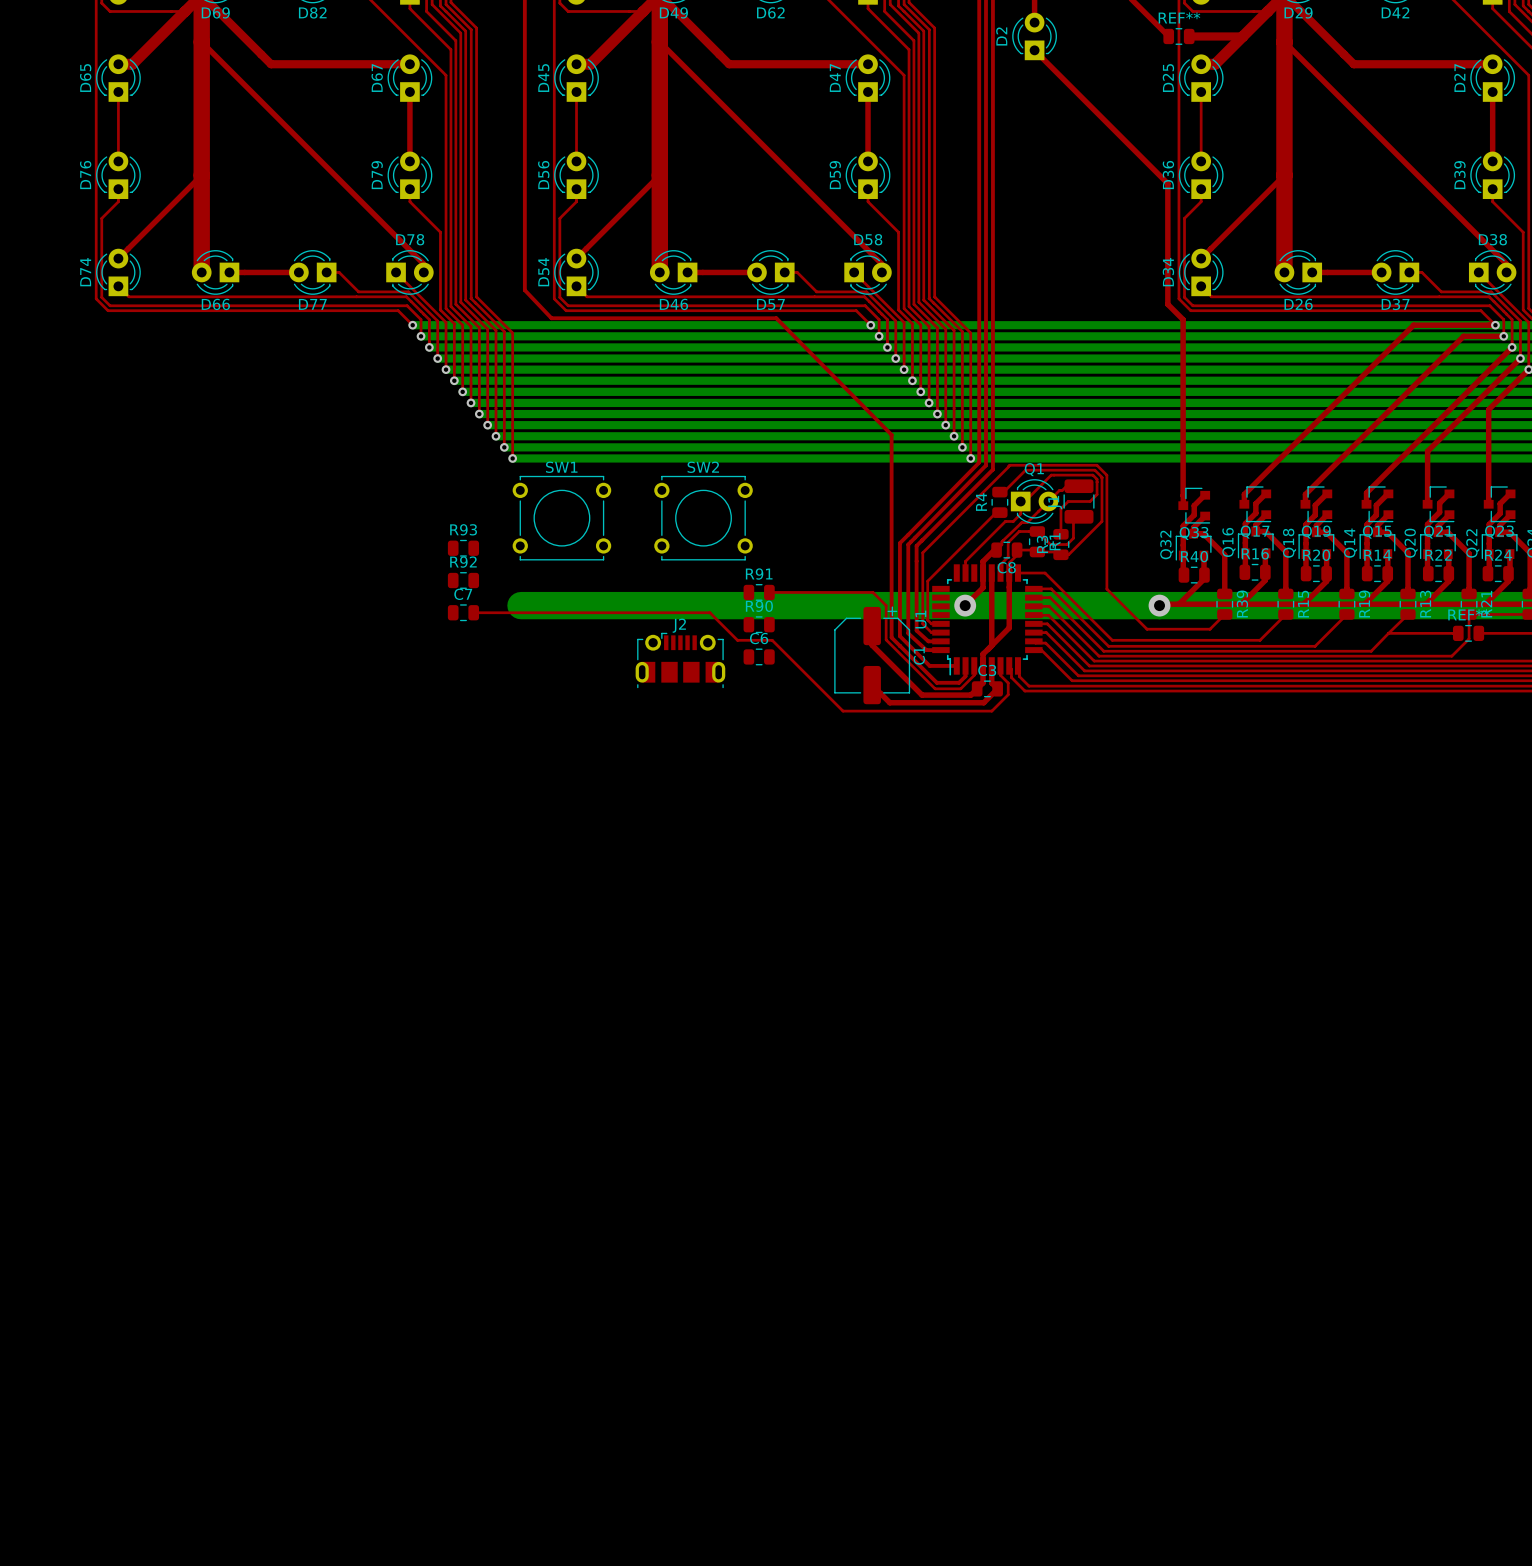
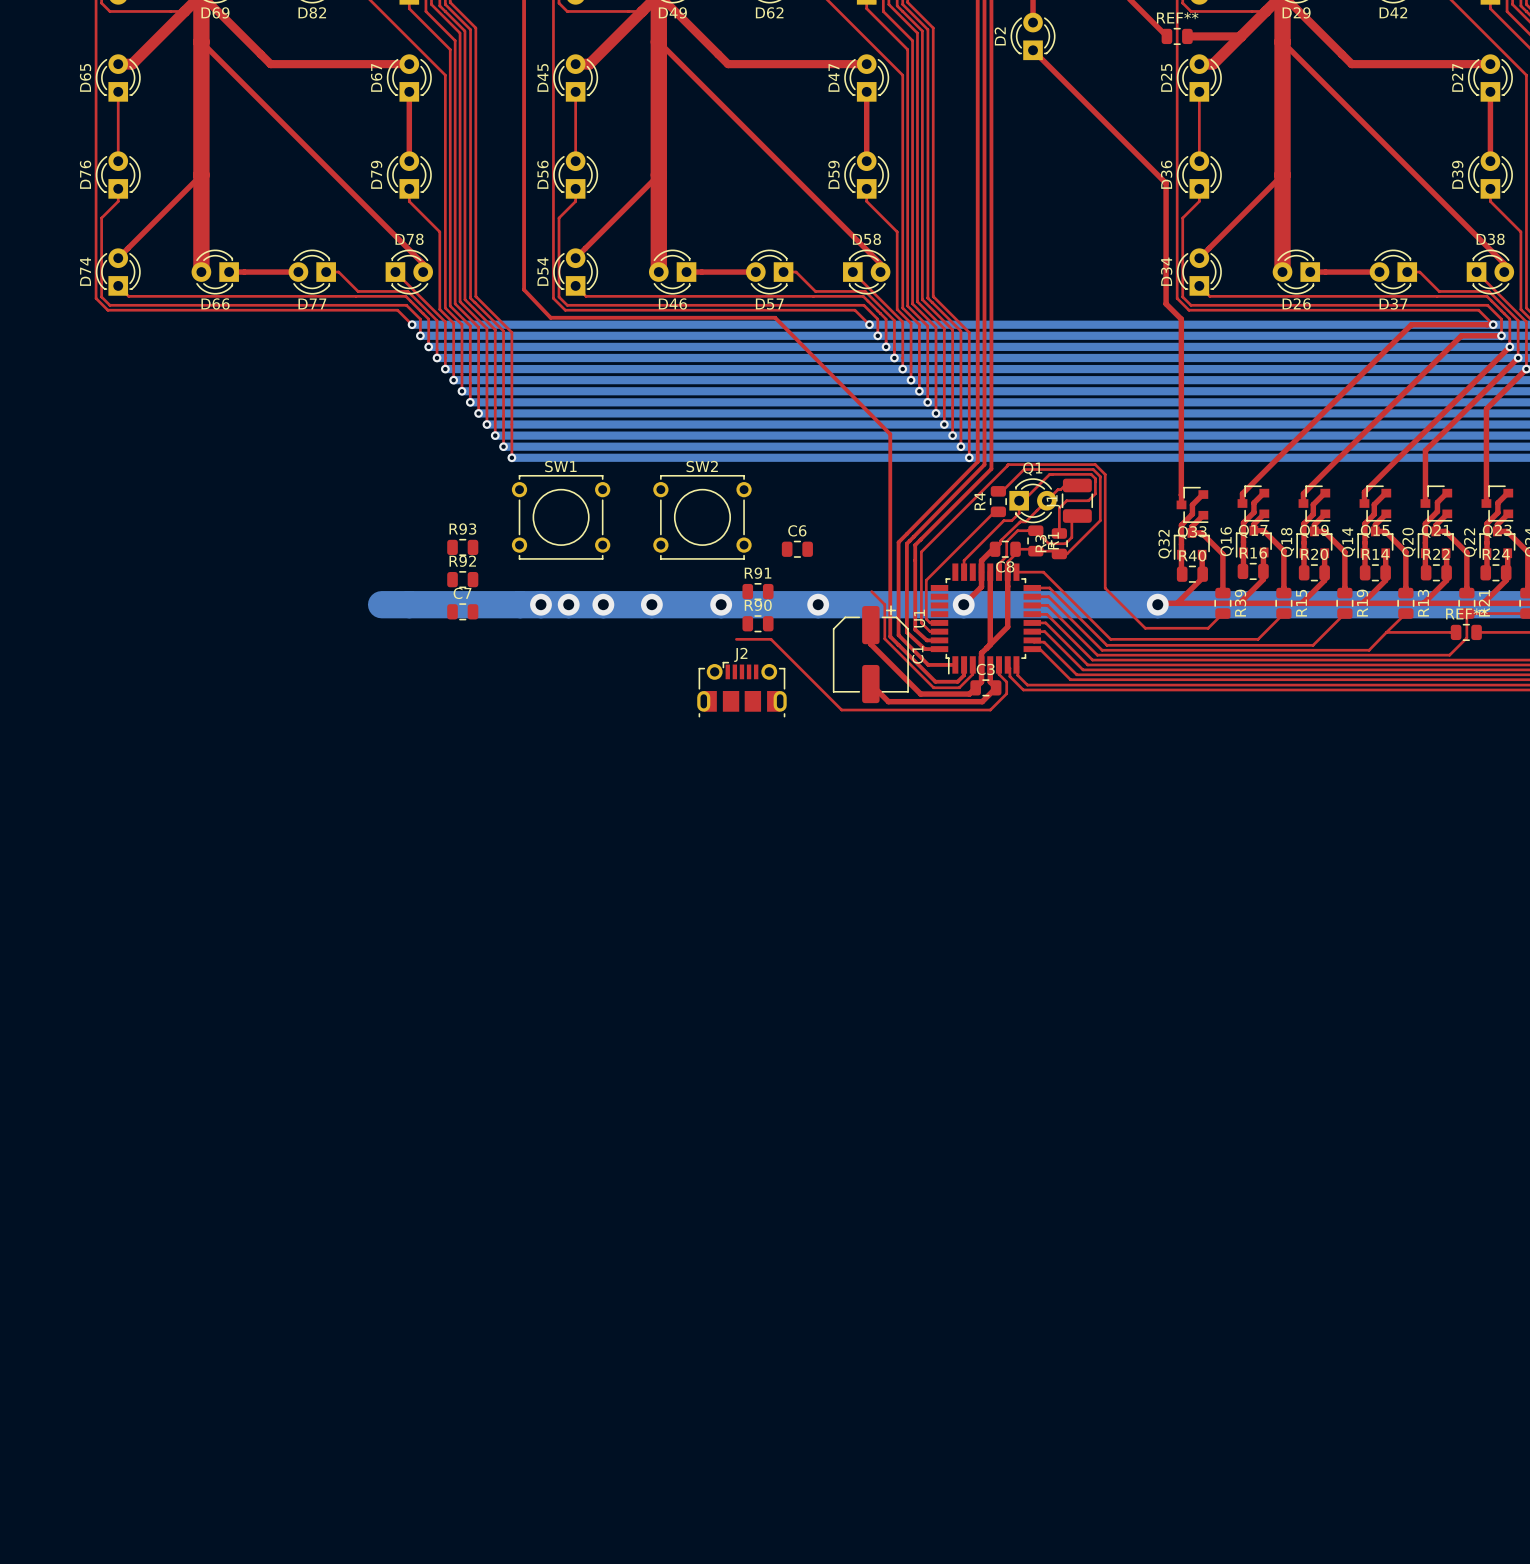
top track: (769, 592) (873, 592) -> none
bottom track: none -> (381, 604) (520, 604)
via: none -> (540, 604)
via: none -> (568, 604)
via: none -> (603, 604)
via: none -> (651, 604)
via: none -> (721, 604)
via: none -> (818, 604)
top track: (473, 612) (709, 612) (737, 640) -> none
C6 position: (759, 656) -> (797, 549)
J2 position: (680, 660) -> (741, 689)

